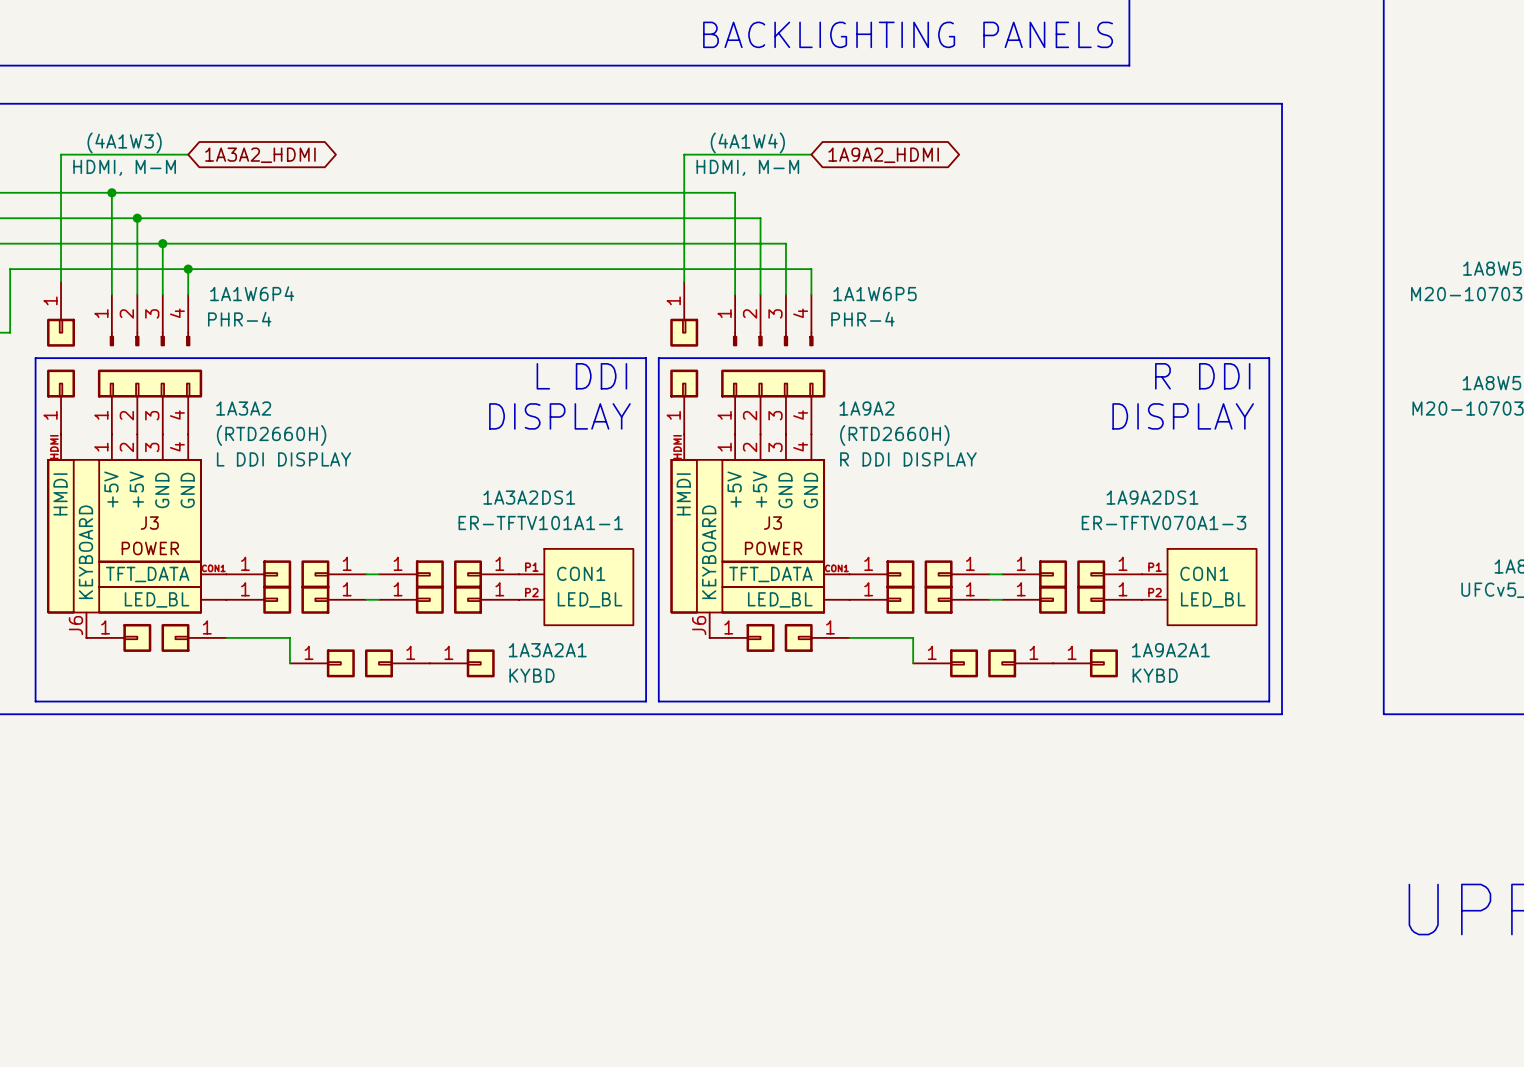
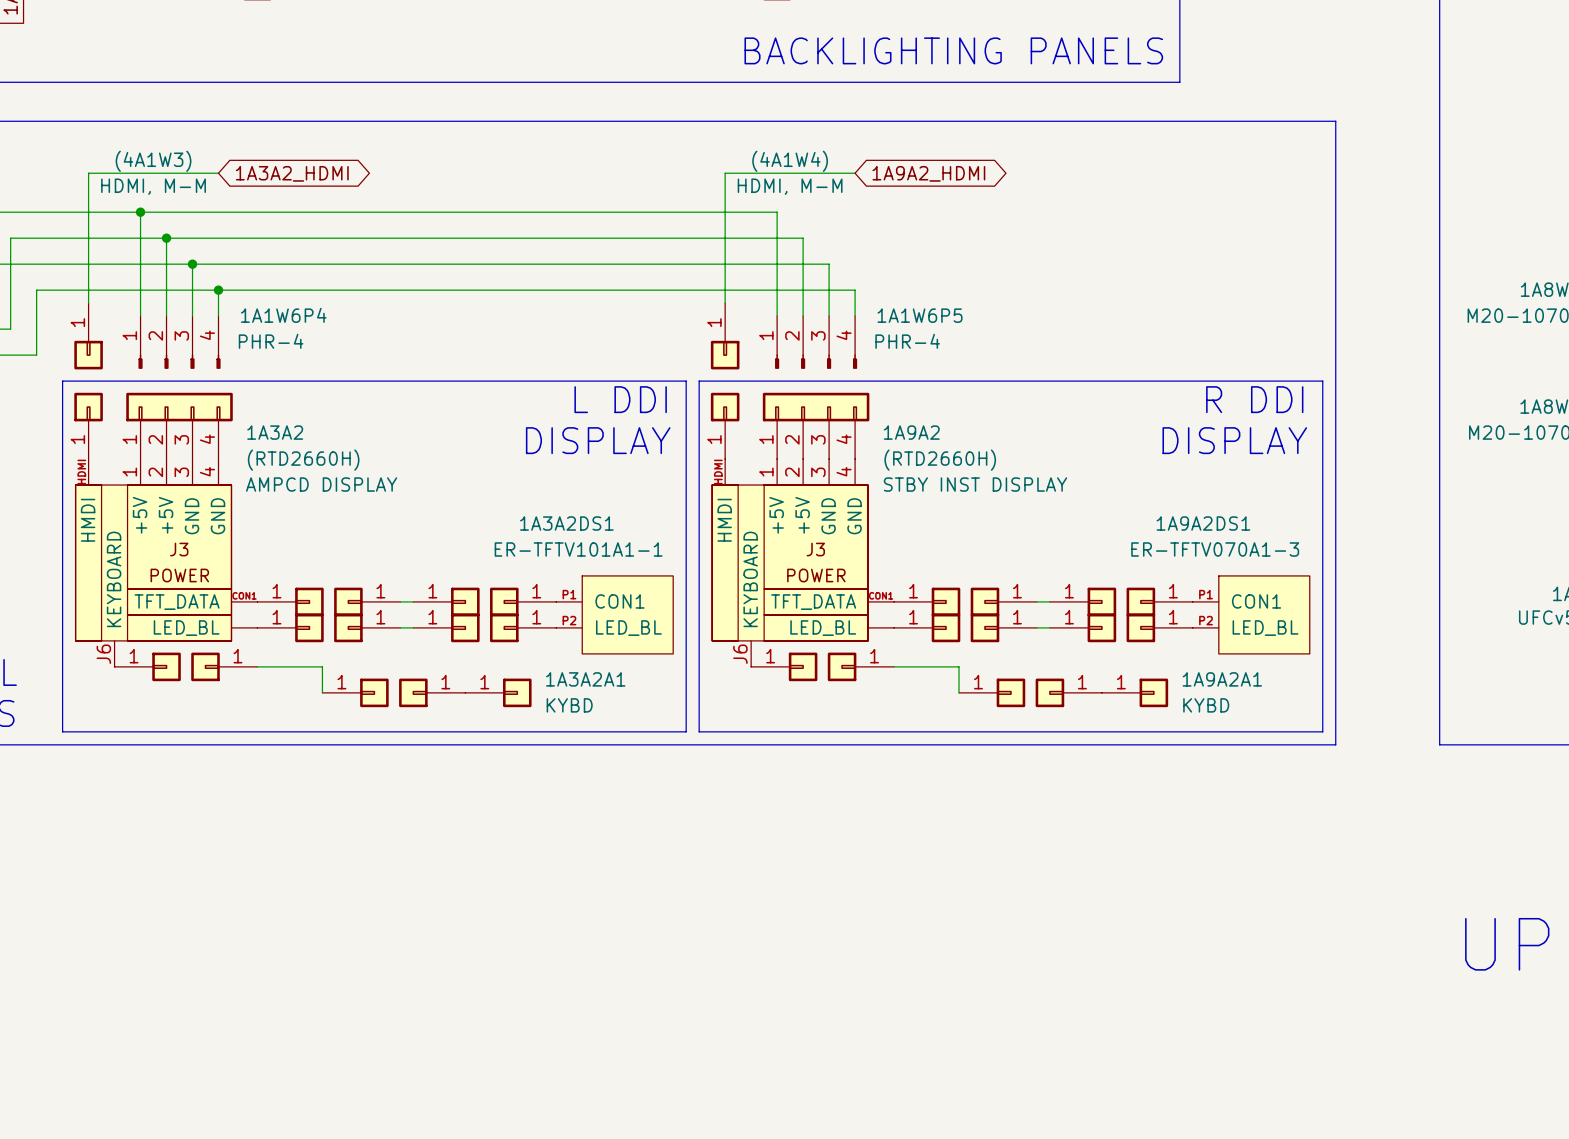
1A3A2 text: L DDI DISPLAY (283, 459) -> AMPCD DISPLAY (321, 484)
1A9A2 text: R DDI DISPLAY (908, 459) -> STBY INST DISPLAY (975, 484)

